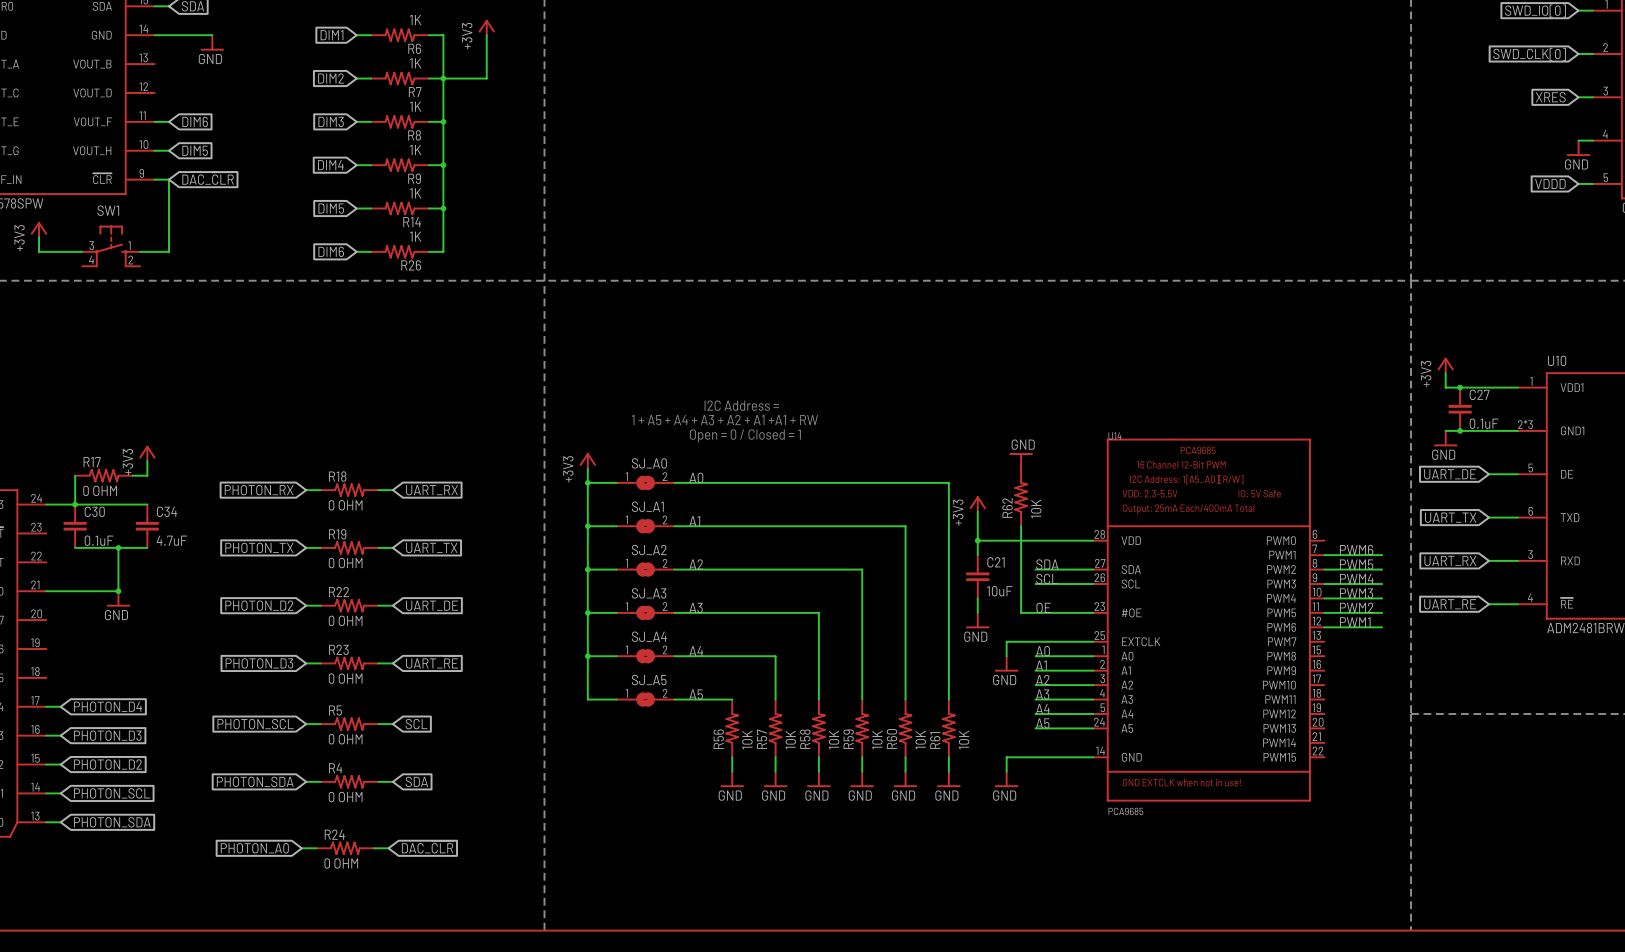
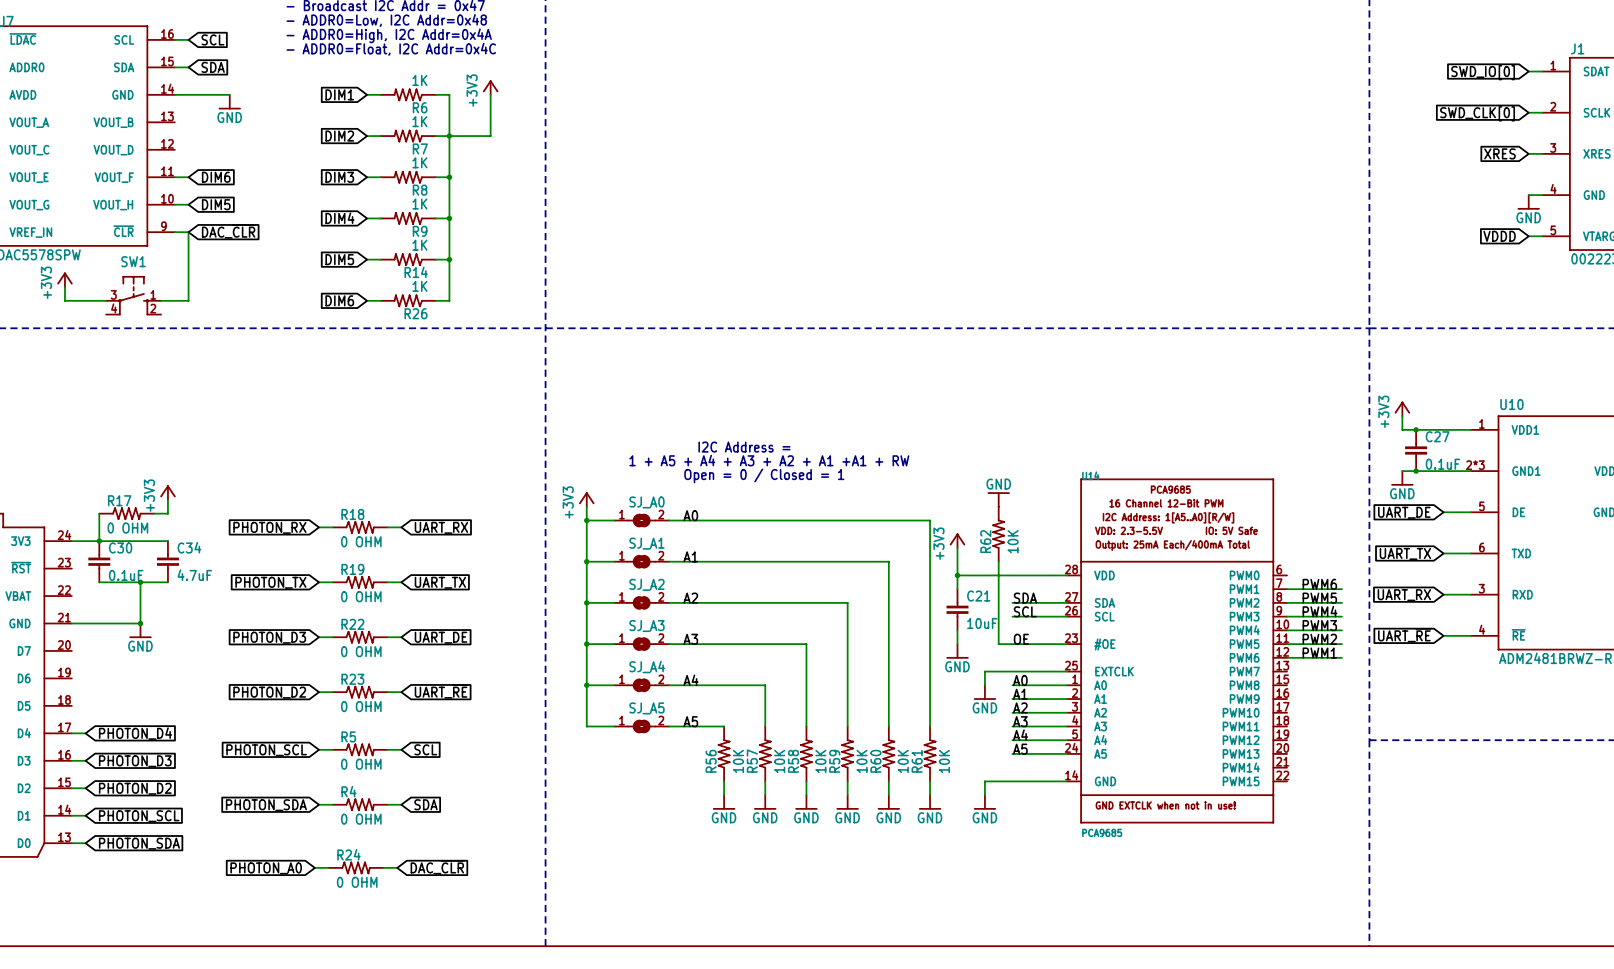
global label: PHOTON_D2 (259, 605) -> PHOTON_D3 (269, 637)
global label: PHOTON_D3 (259, 663) -> PHOTON_D2 (269, 692)

